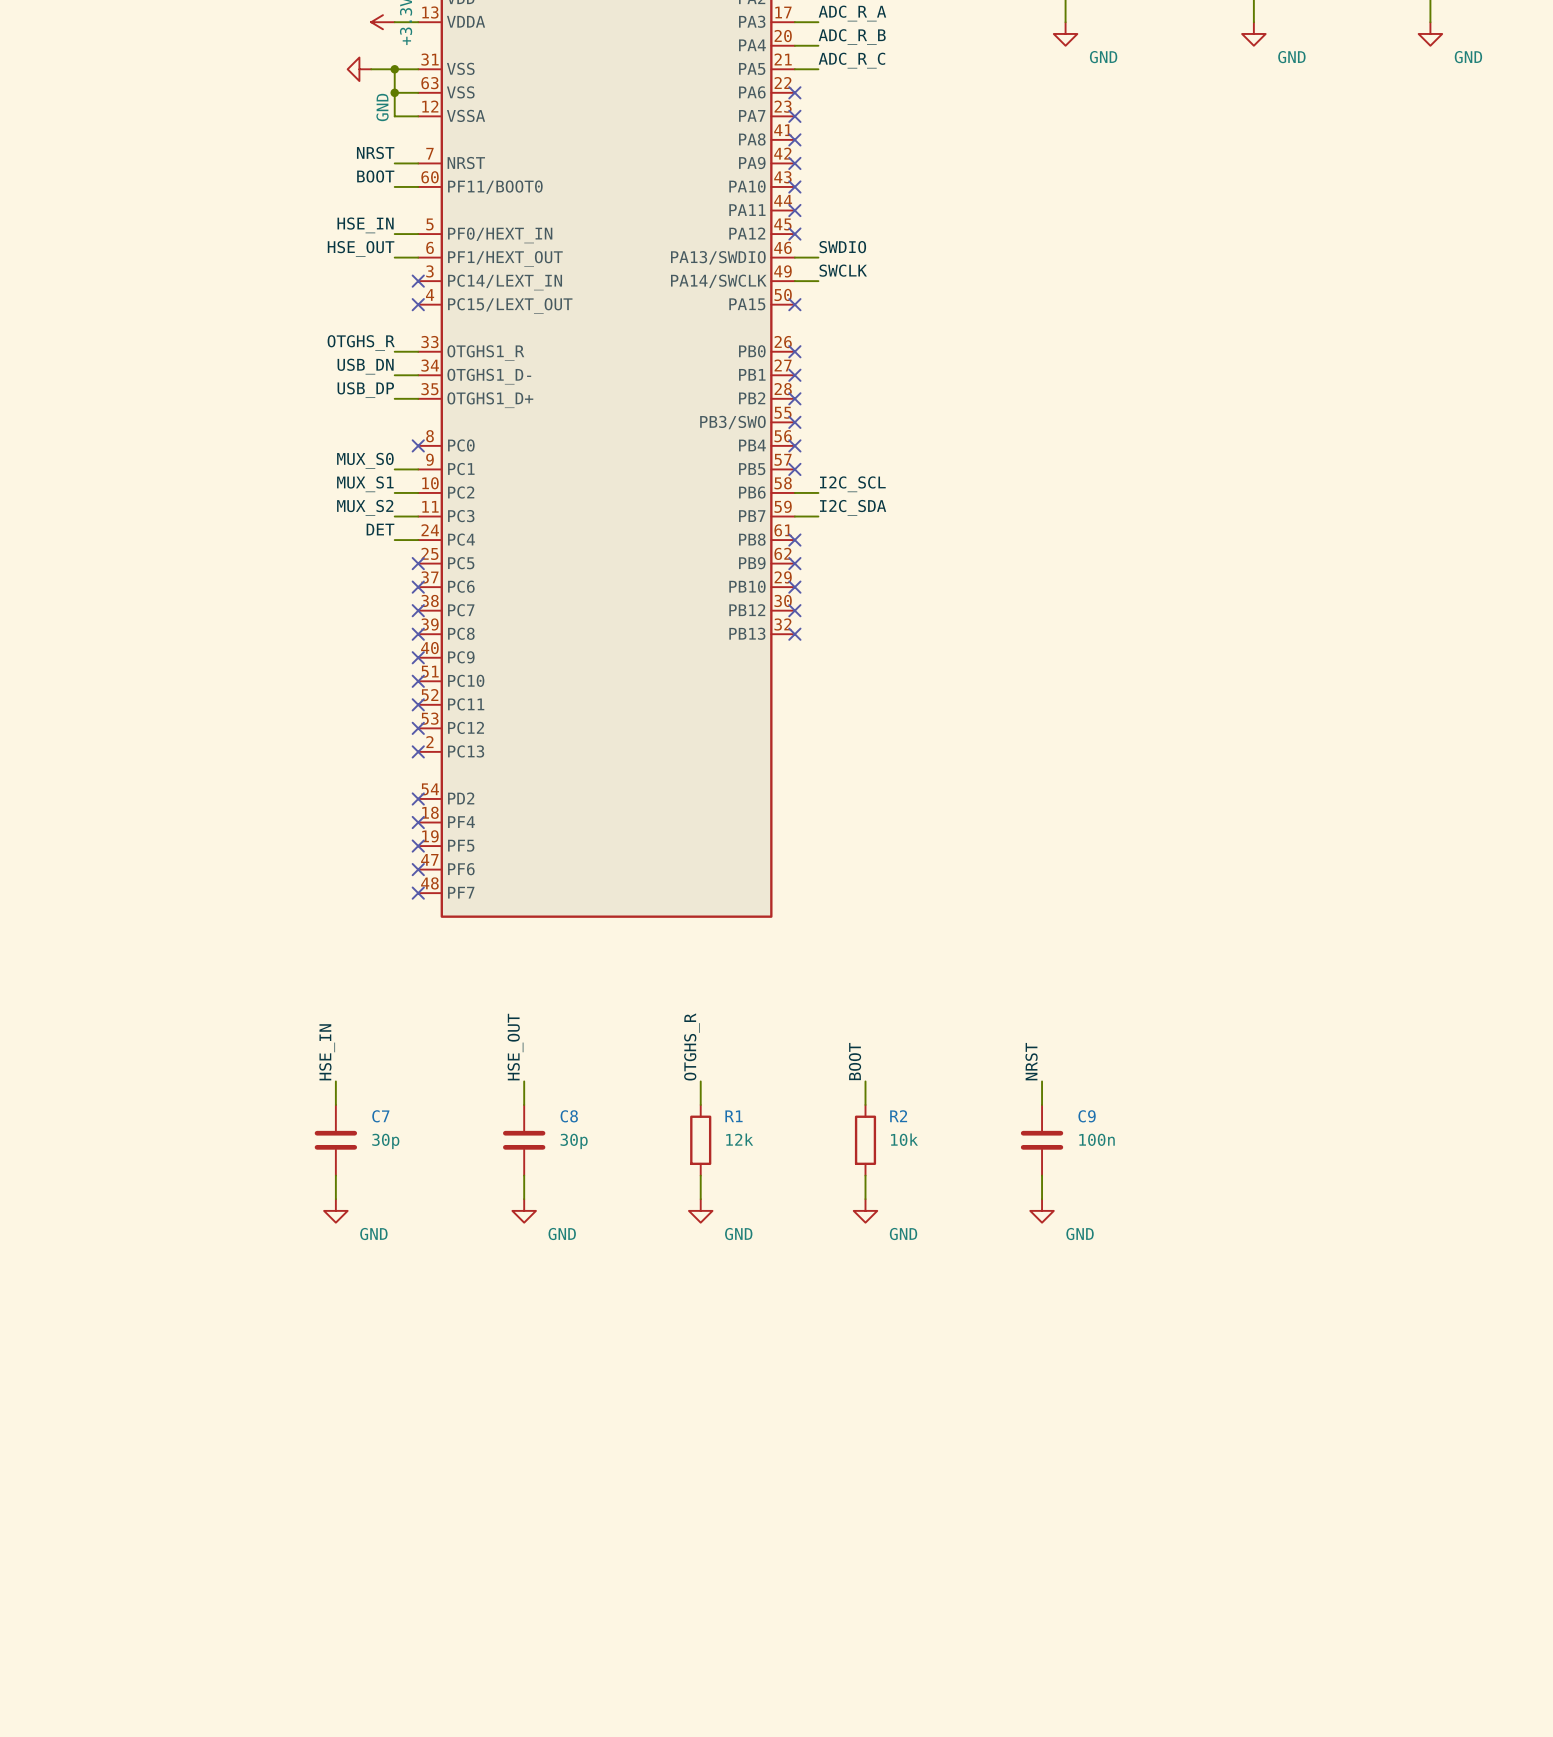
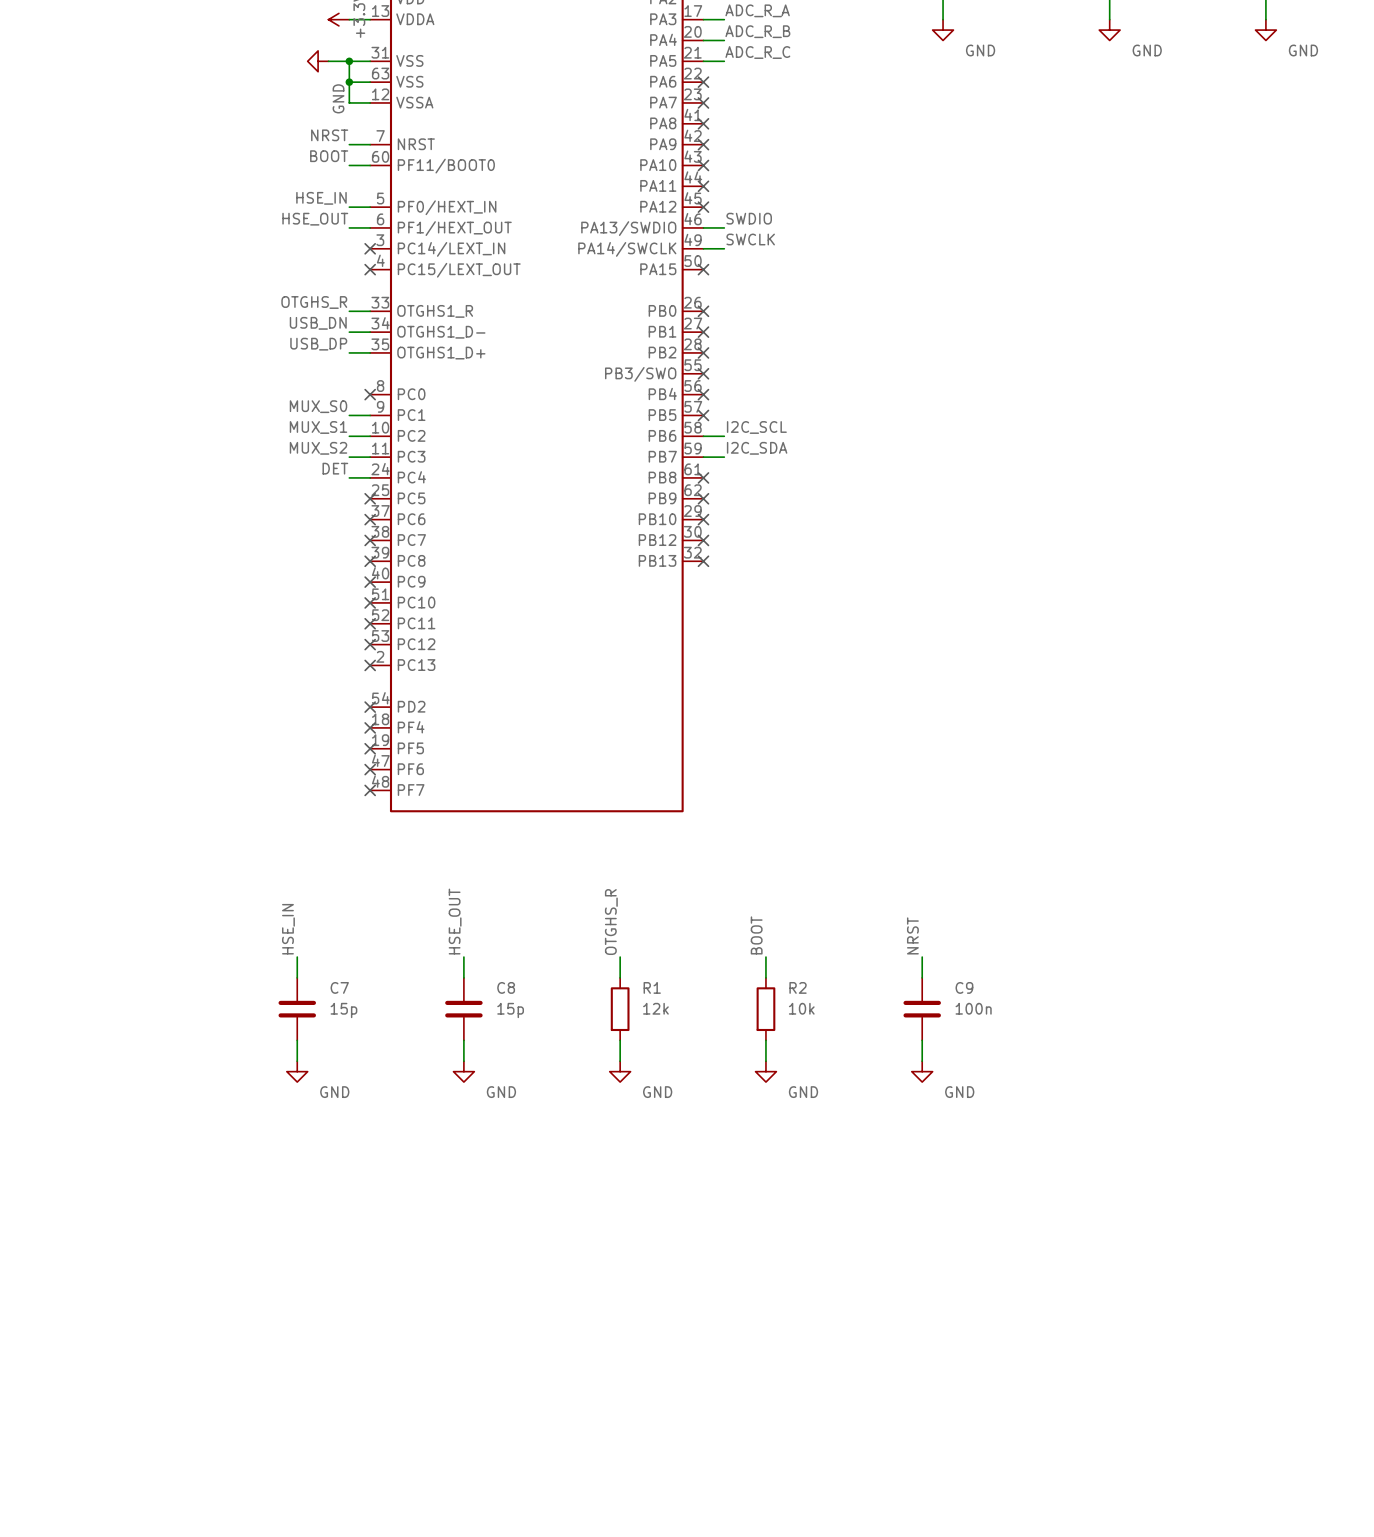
C7 value: 30p (385, 1141) -> 15p (343, 1010)
C8 value: 30p (574, 1141) -> 15p (510, 1010)

